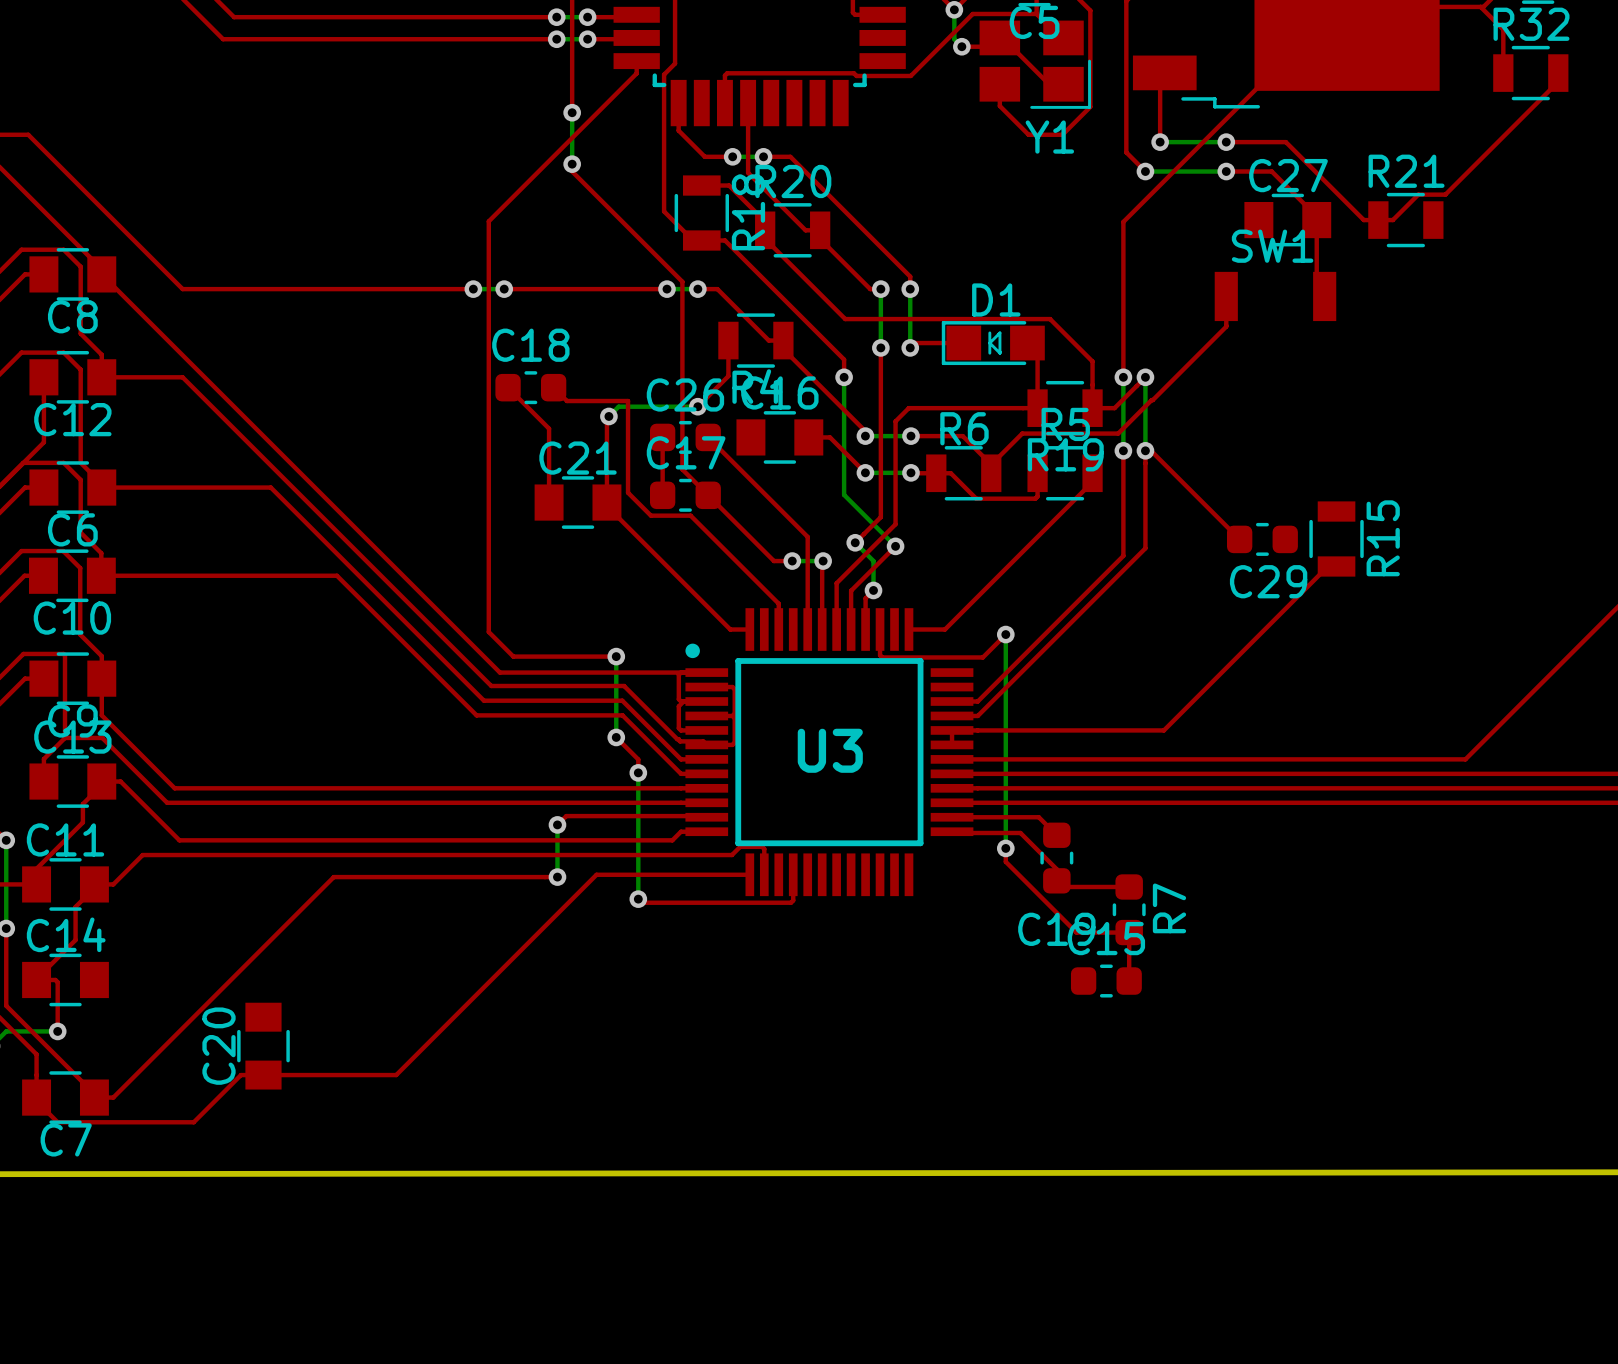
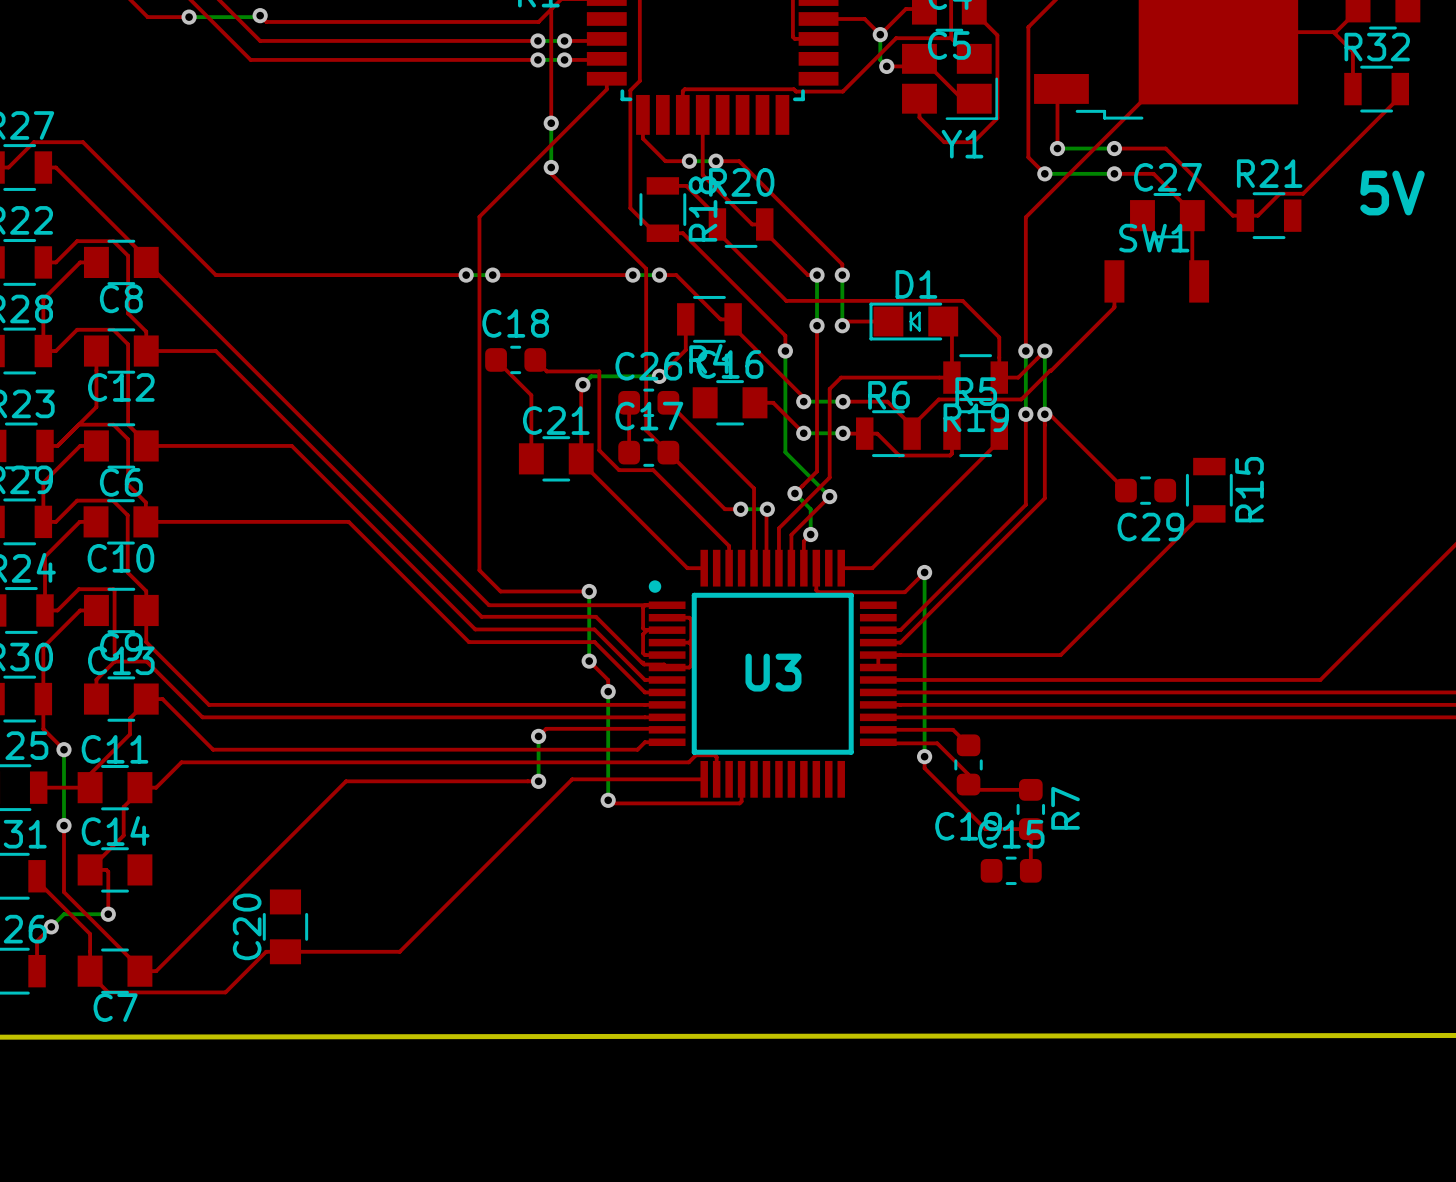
text: none -> 5V (1392, 193)

